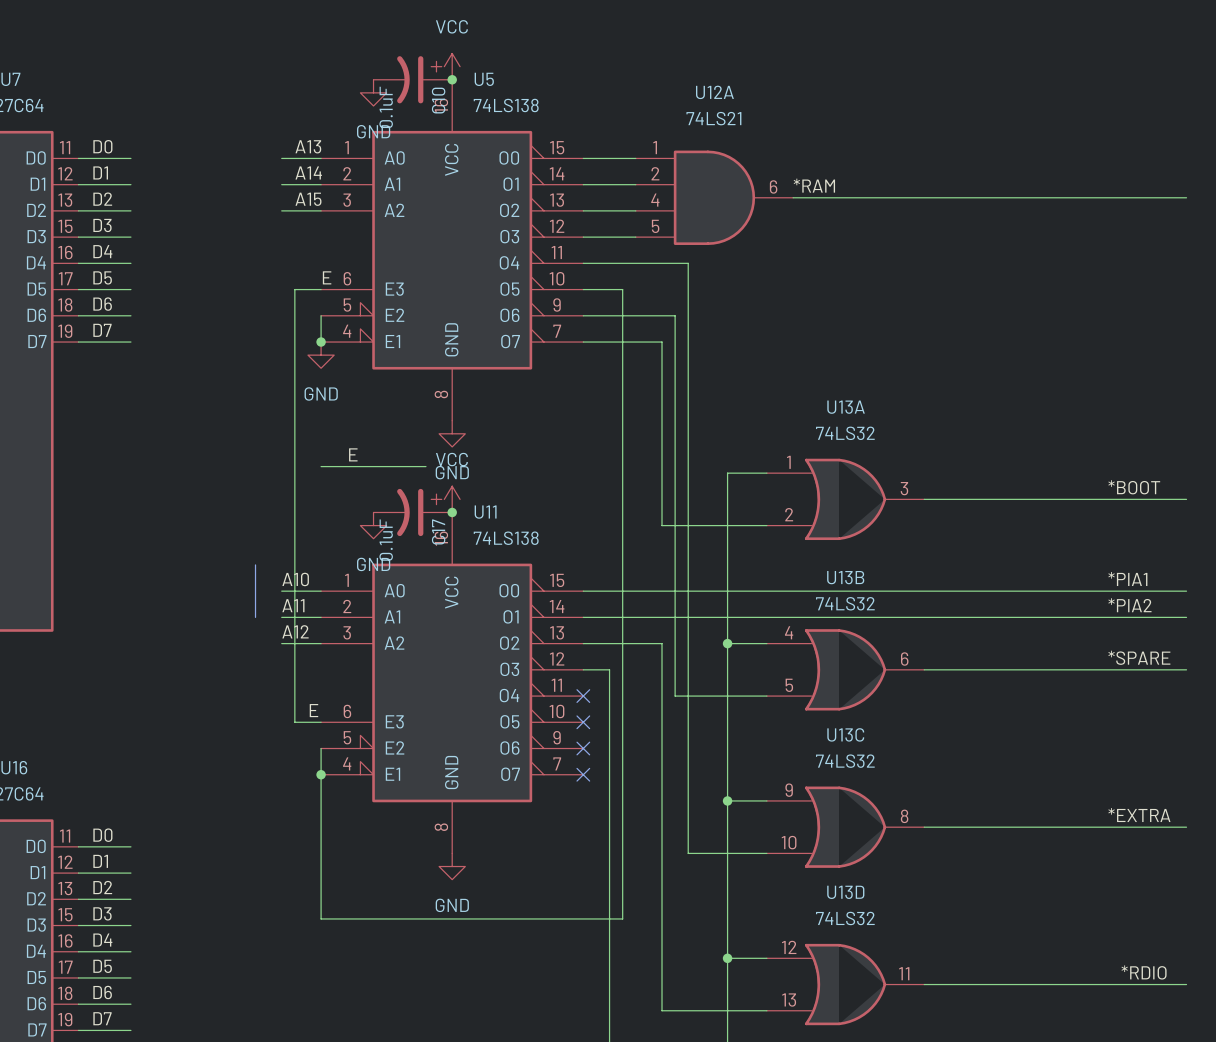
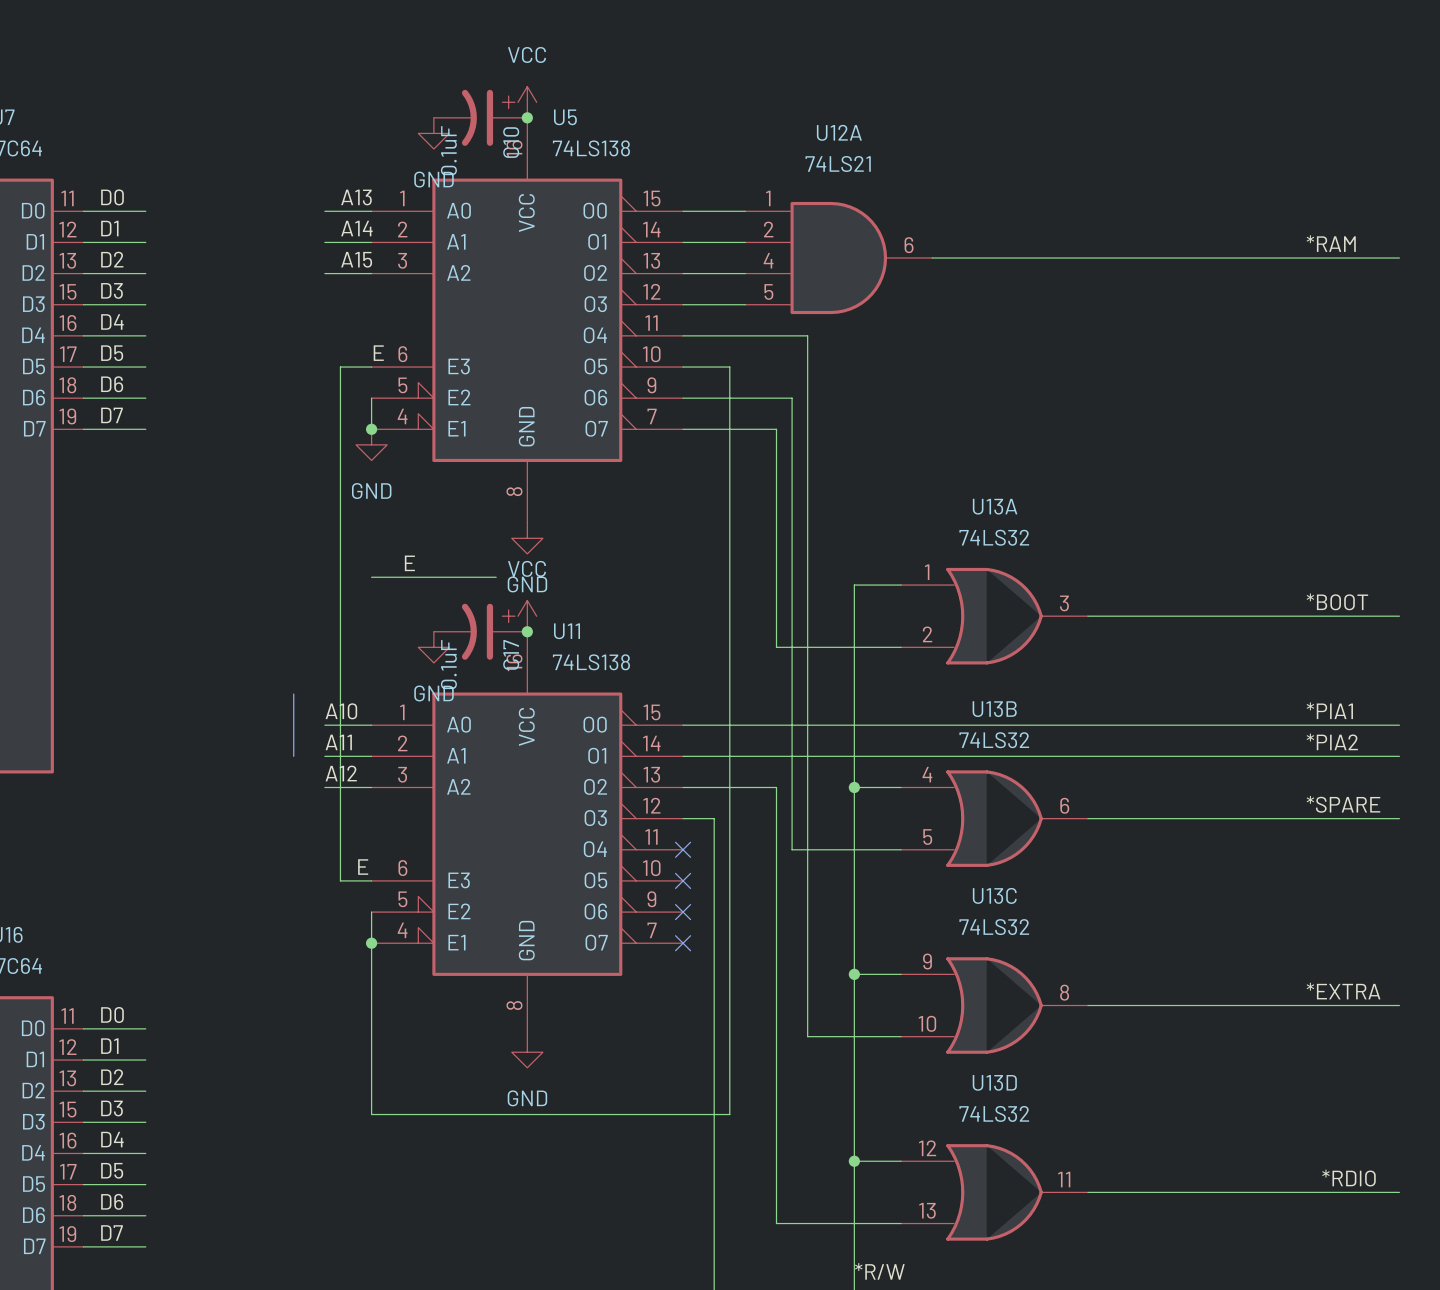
label: *RAM (814, 185) -> none
label: none -> *RAM (1331, 243)

